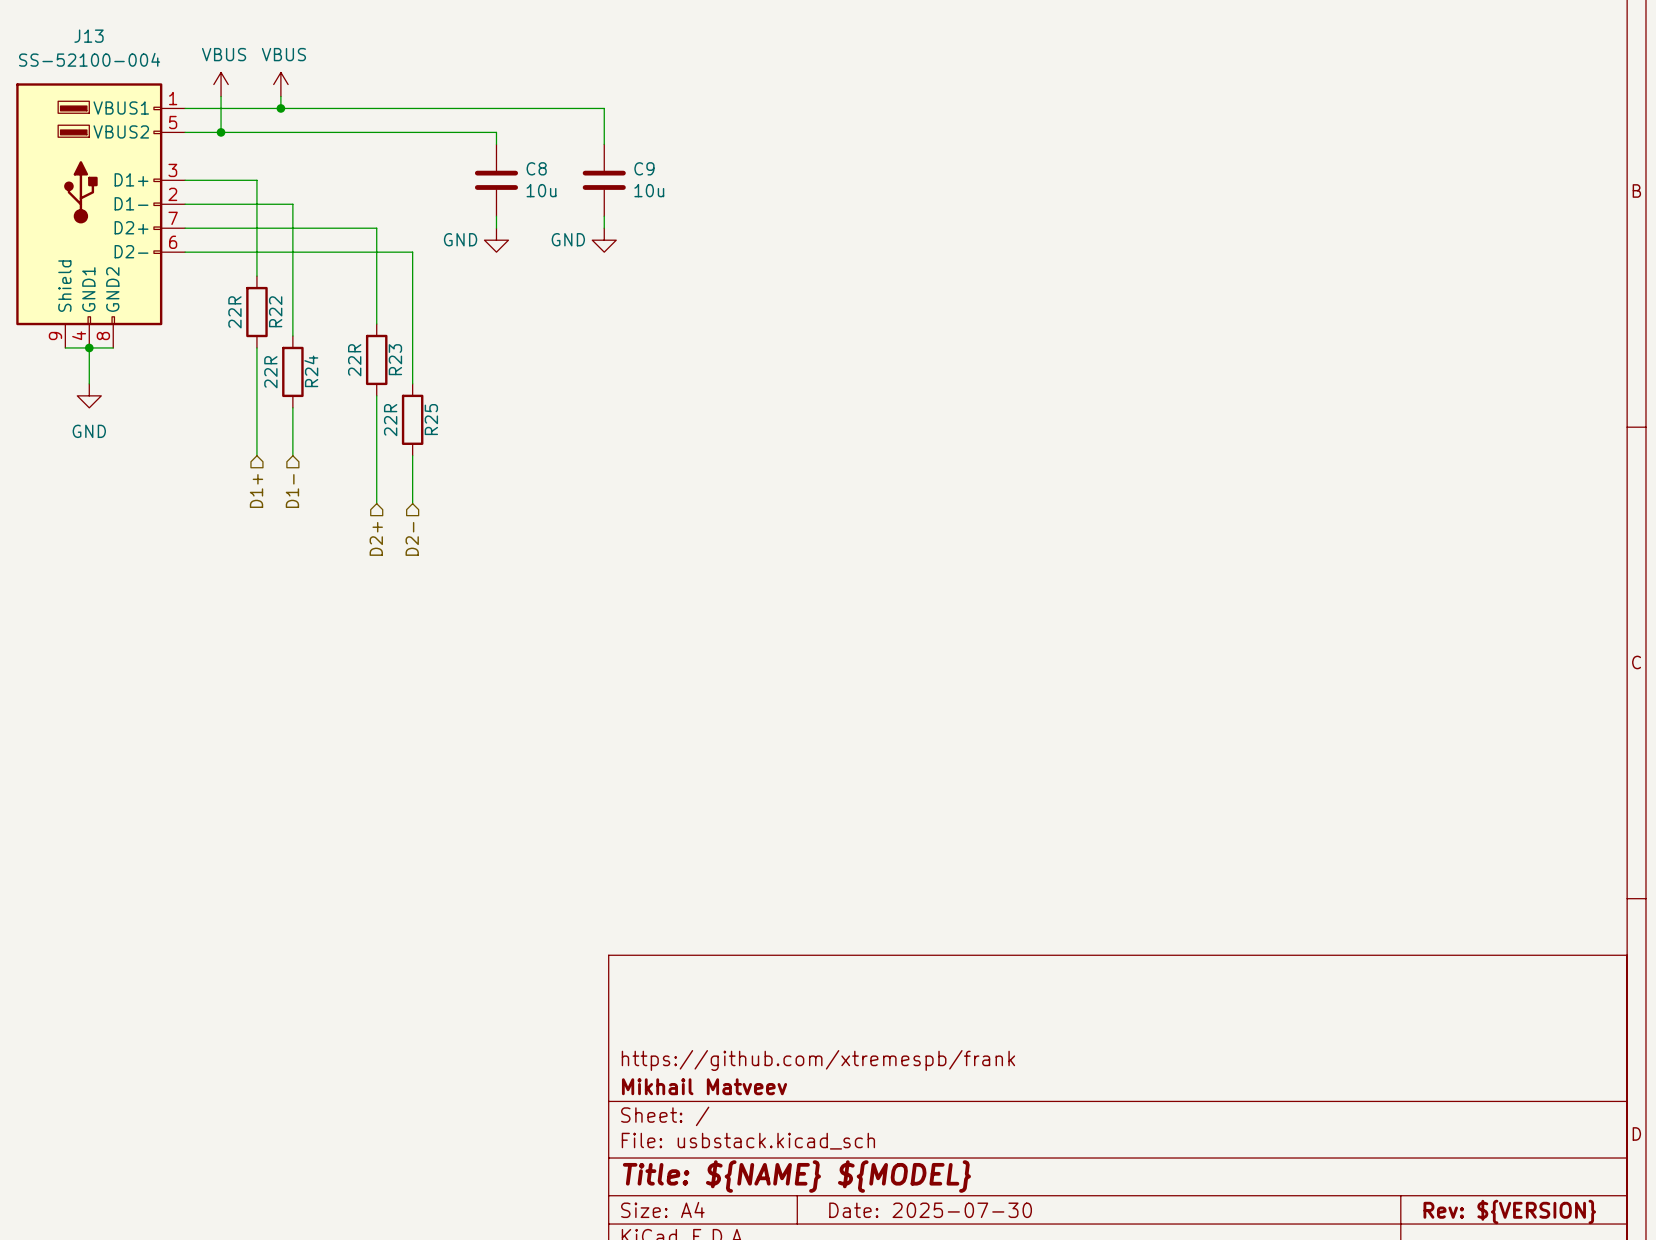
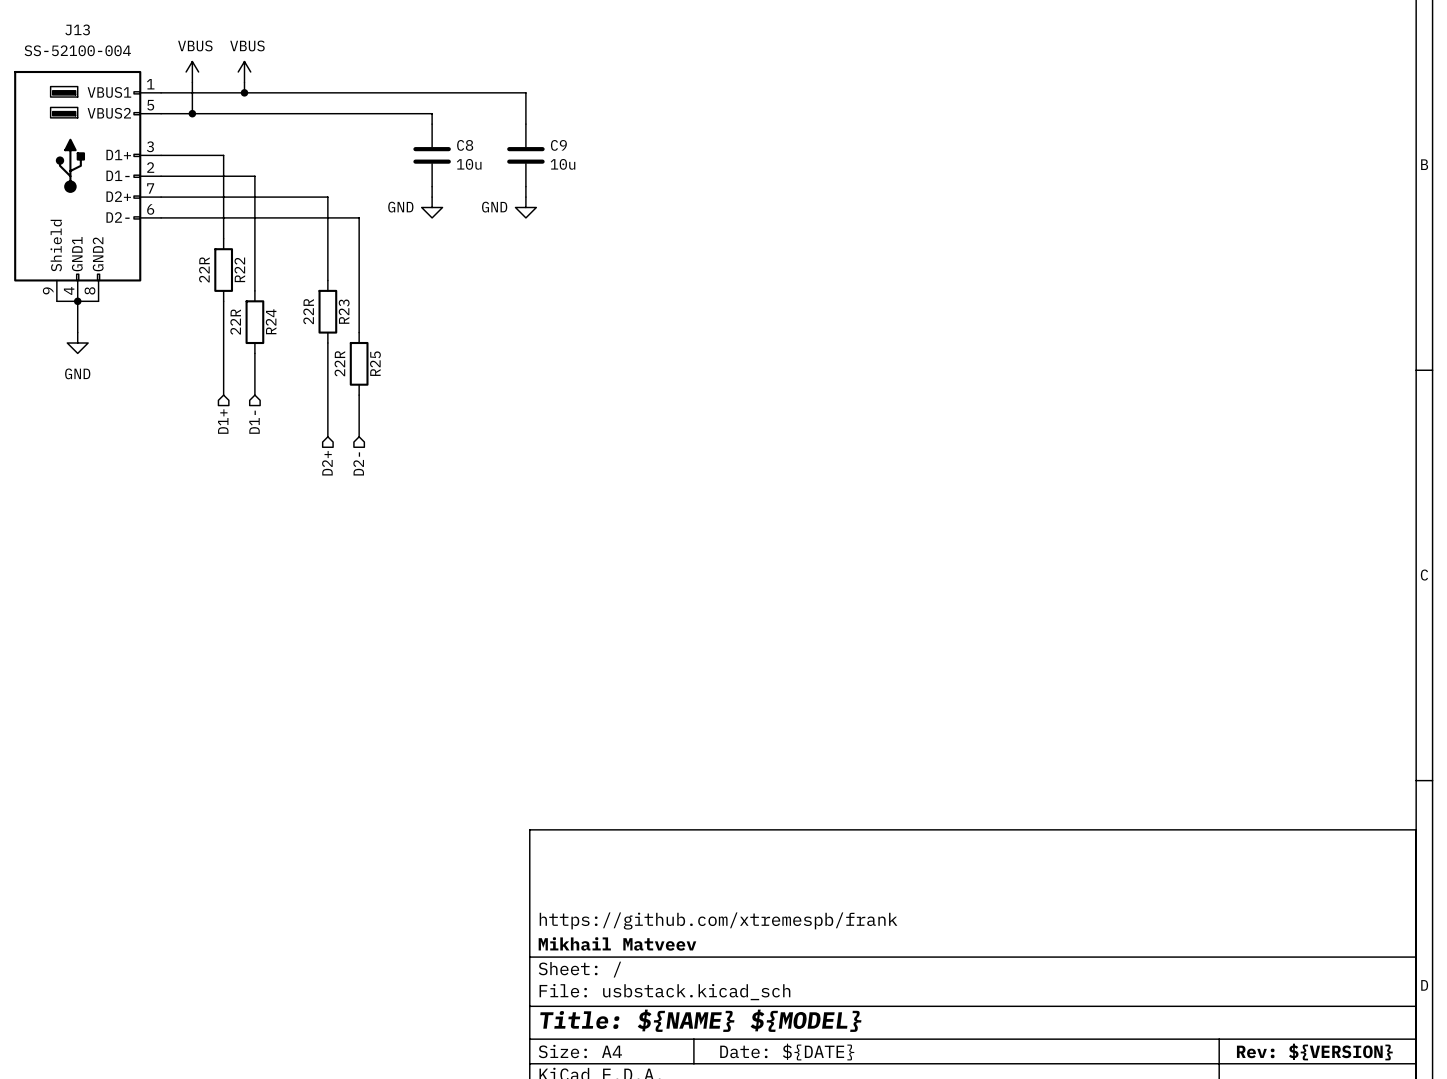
title block: Date: 2025-07-30 (930, 1210) -> Date: ${DATE} (787, 1052)

